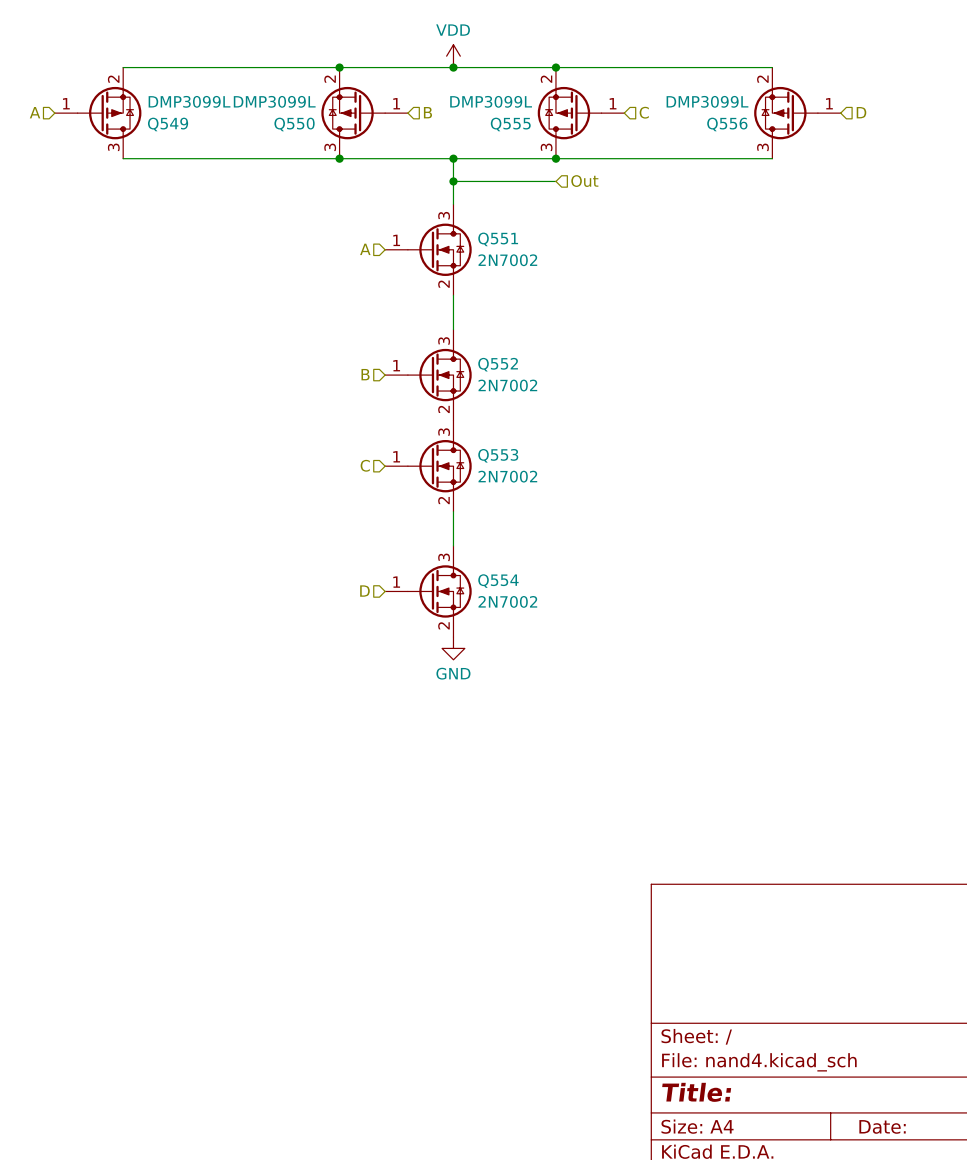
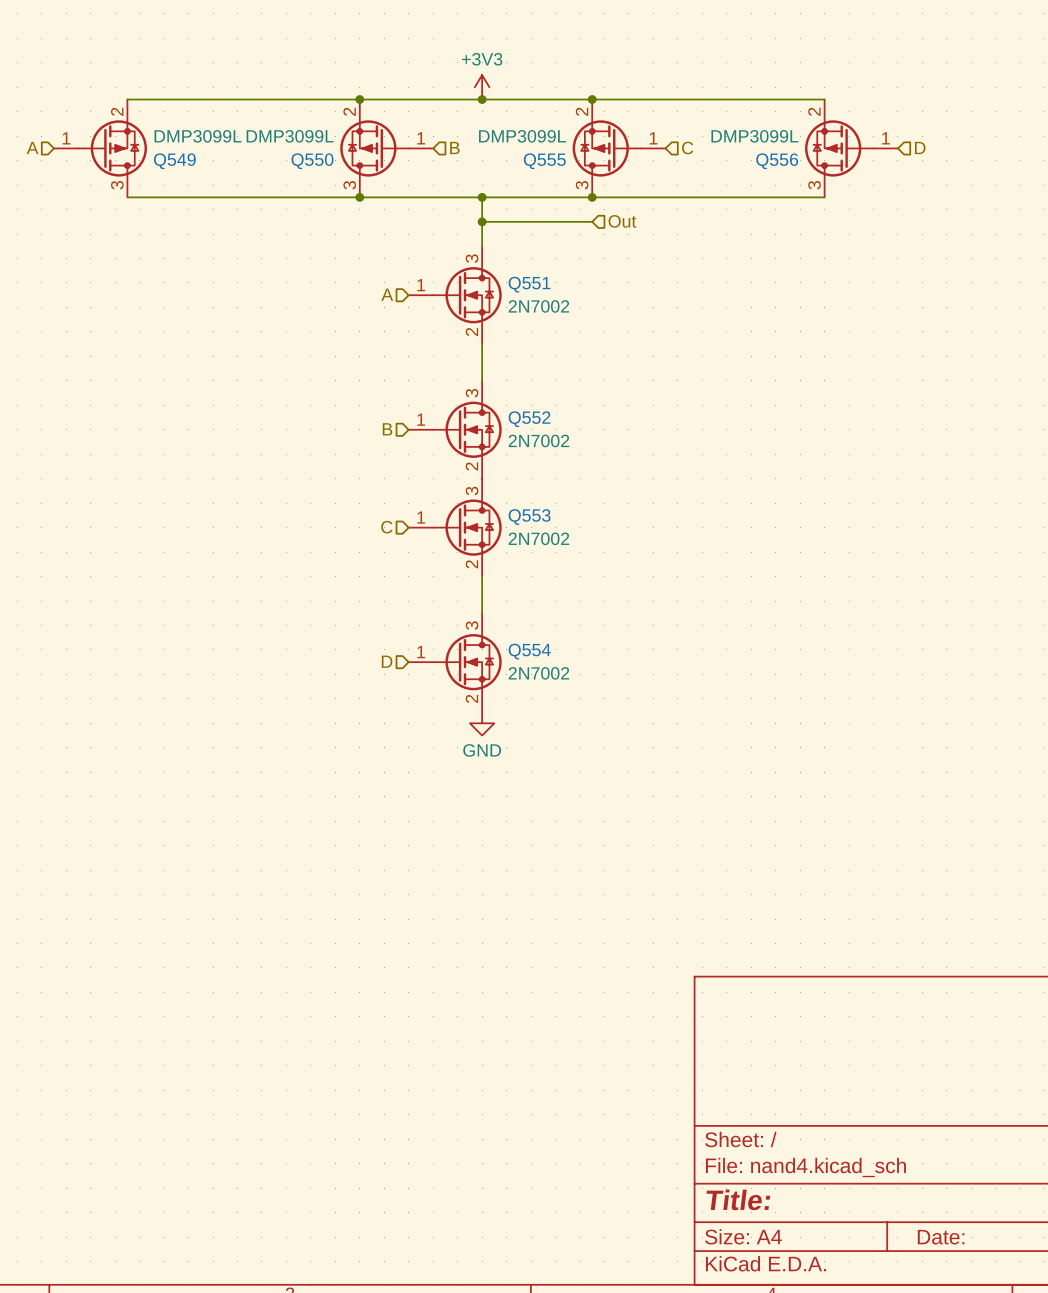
power symbol: VDD (453, 56) -> +3V3 (482, 87)

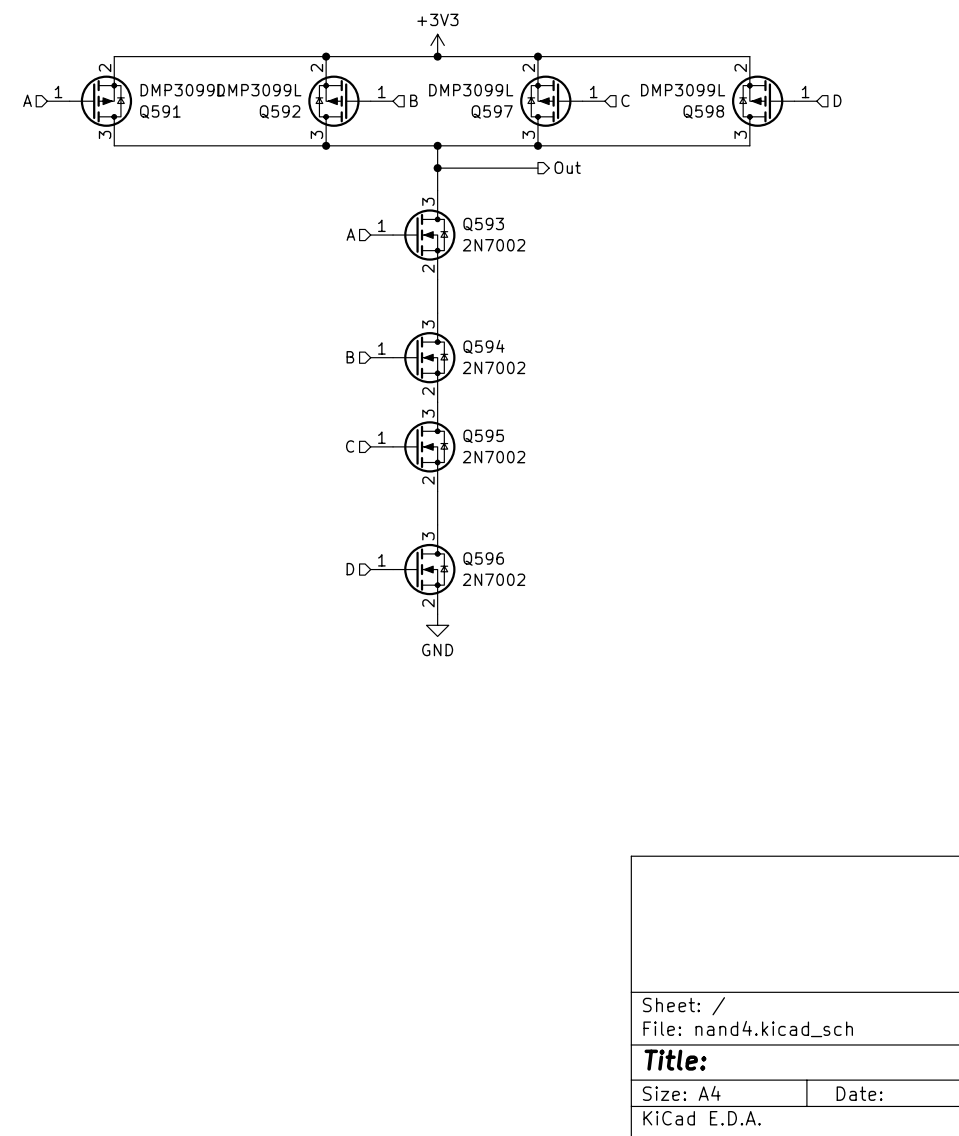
Q549 name: Q549 (174, 161) -> Q591 (160, 111)
Q550 name: Q550 (312, 161) -> Q592 (280, 111)
Q555 name: Q555 (544, 161) -> Q597 (492, 111)
Q556 name: Q556 (777, 161) -> Q598 (703, 111)
hierarchical label shape: input (622, 221) -> output (567, 167)
Q551 name: Q551 (529, 284) -> Q593 (483, 224)
Q552 name: Q552 (529, 419) -> Q594 (483, 346)
Q553 name: Q553 (529, 517) -> Q595 (483, 436)
Q554 name: Q554 (529, 651) -> Q596 (483, 559)

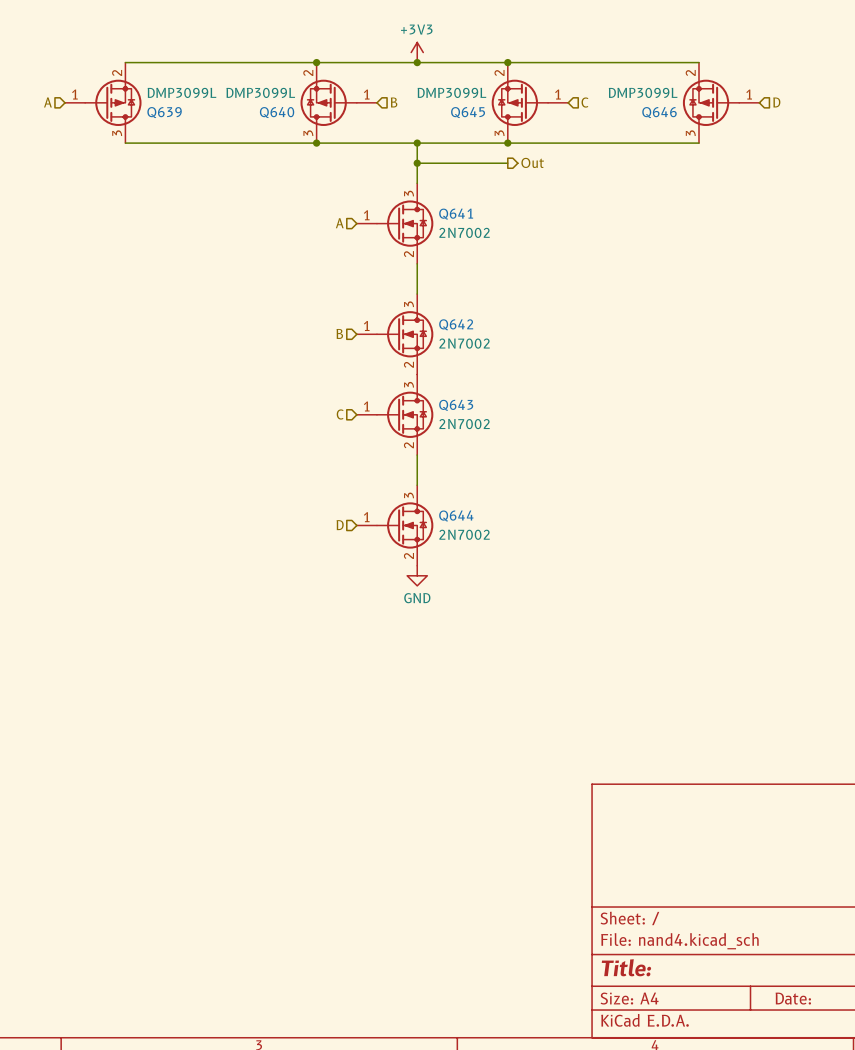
Q591 name: Q591 (160, 111) -> Q639 (164, 112)
Q592 name: Q592 (280, 111) -> Q640 (277, 112)
Q597 name: Q597 (492, 111) -> Q645 (468, 112)
Q598 name: Q598 (703, 111) -> Q646 (659, 112)
Q593 name: Q593 (483, 224) -> Q641 (456, 214)
Q594 name: Q594 (483, 346) -> Q642 (456, 324)
Q595 name: Q595 (483, 436) -> Q643 (456, 405)
Q596 name: Q596 (483, 559) -> Q644 (456, 515)

